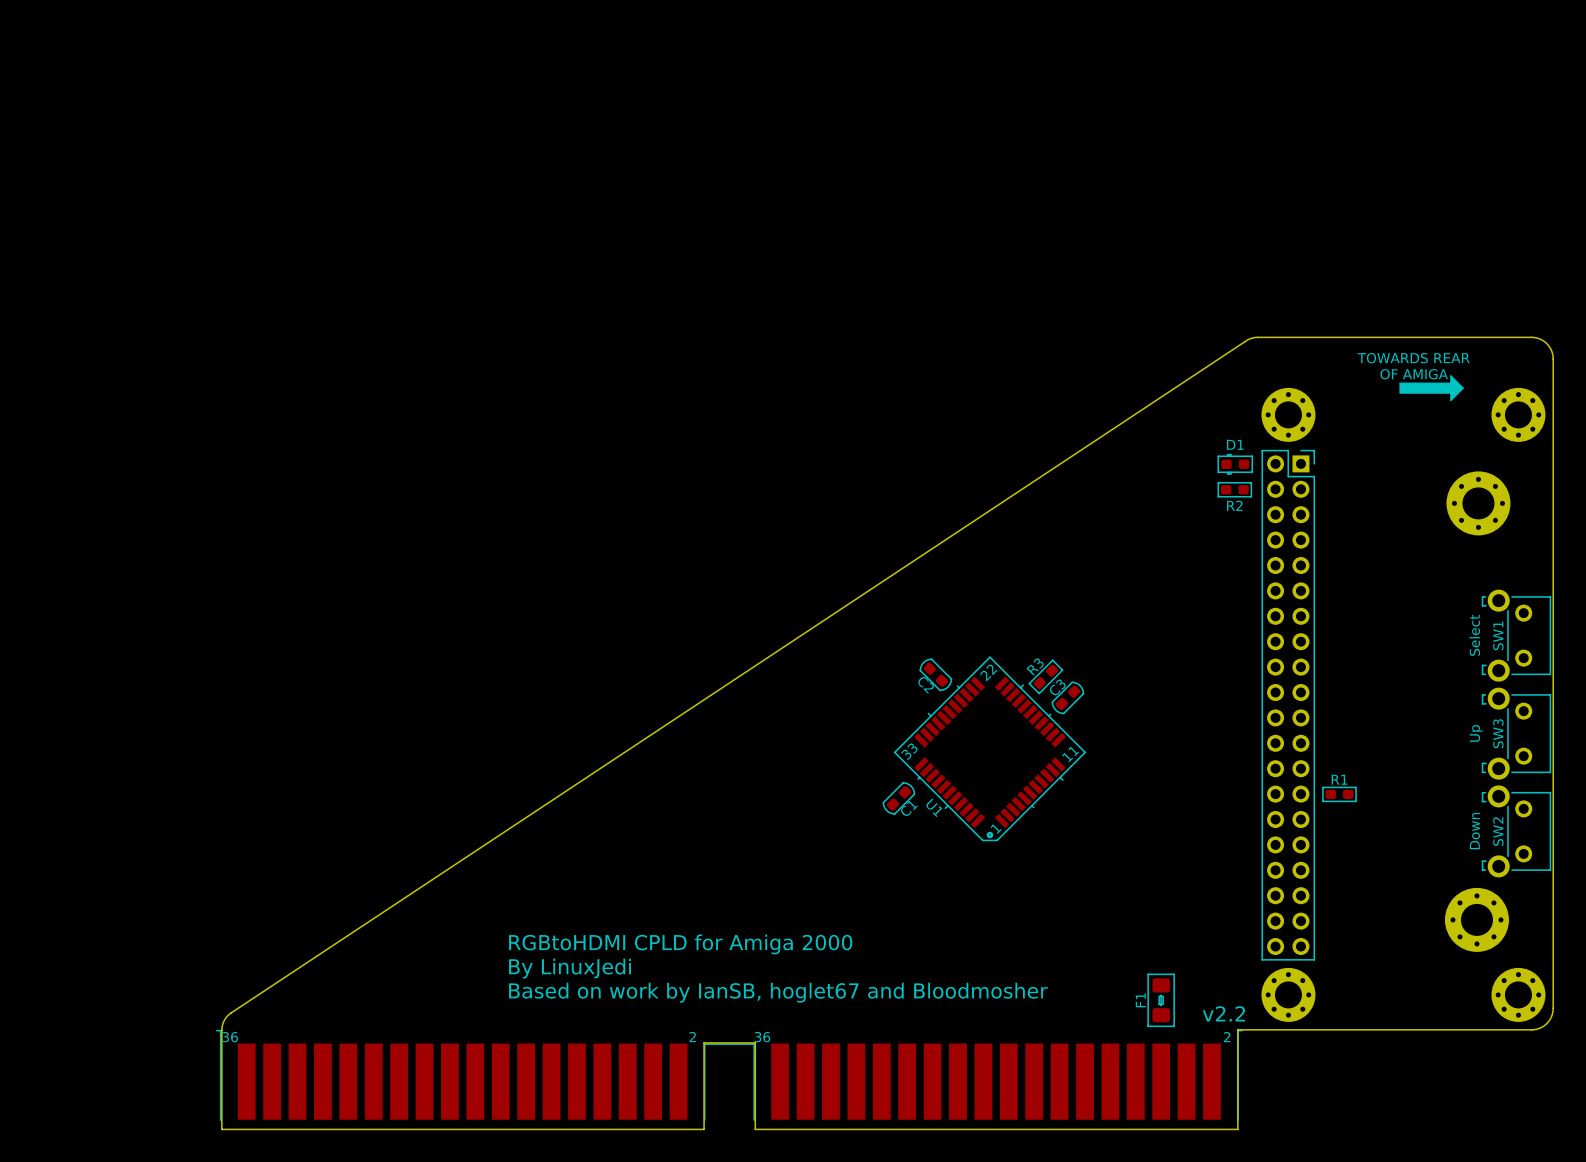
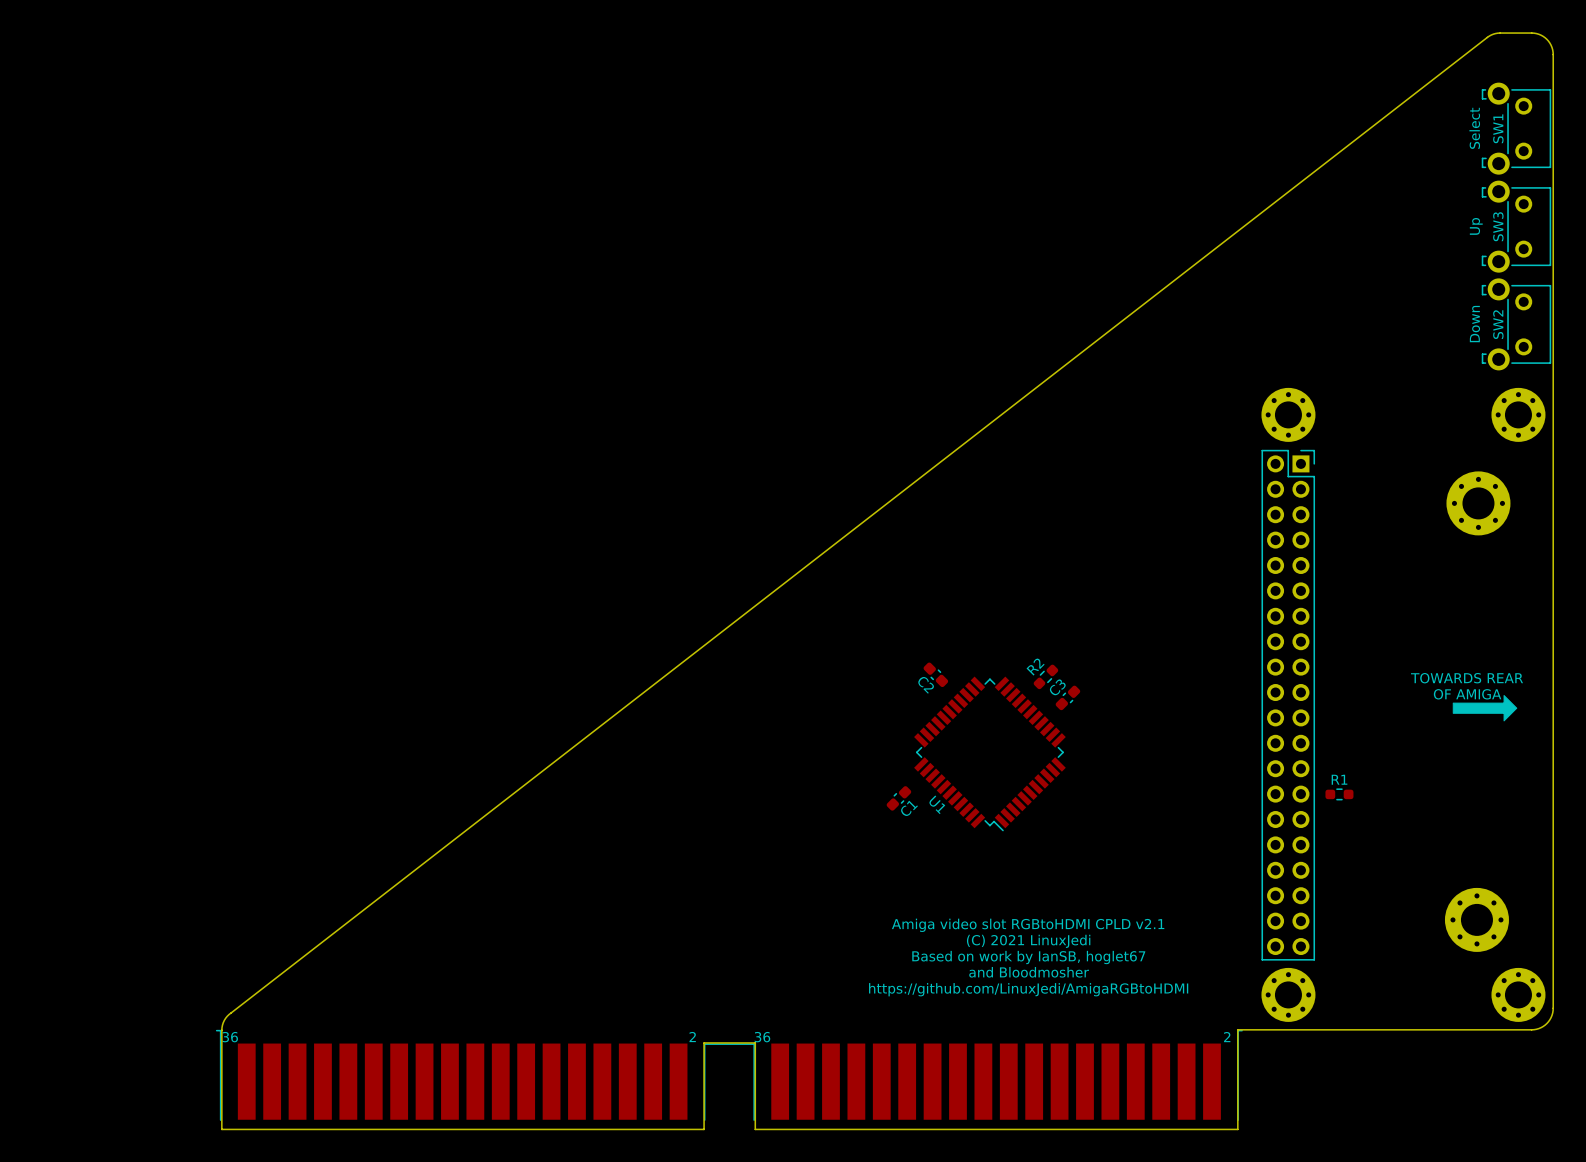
text: none -> Select (1474, 128)
text: none -> Up (1476, 226)
text: none -> Down (1474, 324)
text: TOWARDS REAR (1413, 358) -> none
board edge: (1553, 358) (1551, 349) (1546, 343) (1534, 337) (1257, 337) (1248, 339) (231, 1012) -> (1553, 358) (1552, 49) (1546, 39) (1536, 33) (1495, 33) (1487, 37) (231, 1012)
drawing: [1399, 374, 1464, 402] -> none
text: OF AMIGA (1414, 374) -> none
D1: (1235, 464) -> none
R2 footprint: [1217, 482, 1252, 498] -> [1033, 664, 1059, 690]
R2 name position: R2 (1234, 505) -> R2 (1035, 667)
text: Select (1474, 635) -> none
SW1 position: (1516, 635) -> (1516, 128)
U1 footprint: [894, 656, 1086, 842] -> [914, 676, 1066, 832]
C2 footprint: [919, 658, 953, 691] -> [923, 662, 949, 688]
R3: (1045, 676) -> none
text: none -> TOWARDS REAR (1467, 678)
C3 footprint: [1051, 681, 1085, 715] -> [1055, 685, 1081, 711]
text: none -> OF AMIGA (1467, 694)
drawing: none -> [1452, 695, 1518, 722]
text: Up (1476, 733) -> none
SW3 position: (1516, 733) -> (1516, 226)
C1 footprint: [882, 782, 916, 815] -> [886, 786, 912, 811]
R1 footprint: [1322, 786, 1357, 802] -> [1325, 788, 1354, 801]
text: Down (1474, 831) -> none
SW2 position: (1516, 831) -> (1516, 324)
text: none -> Amiga video slot RGBtoHDMI CPLD v2.1 (1028, 925)
text: none -> (C) 2021 LinuxJedi (1028, 941)
text: RGBtoHDMI CPLD for Amiga 2000 (680, 944) -> none
text: none -> Based on work by IanSB, hoglet67 (1028, 957)
text: By LinuxJedi (570, 968) -> none
text: none -> and Bloodmosher (1029, 972)
text: none -> https://github.com/LinuxJedi/AmigaRGBtoHDMI (1028, 989)
text: Based on work by IanSB, hoglet67 and Bloodmosher (778, 992) -> none
F1: (1161, 1000) -> none
text: v2.2 (1223, 1013) -> none

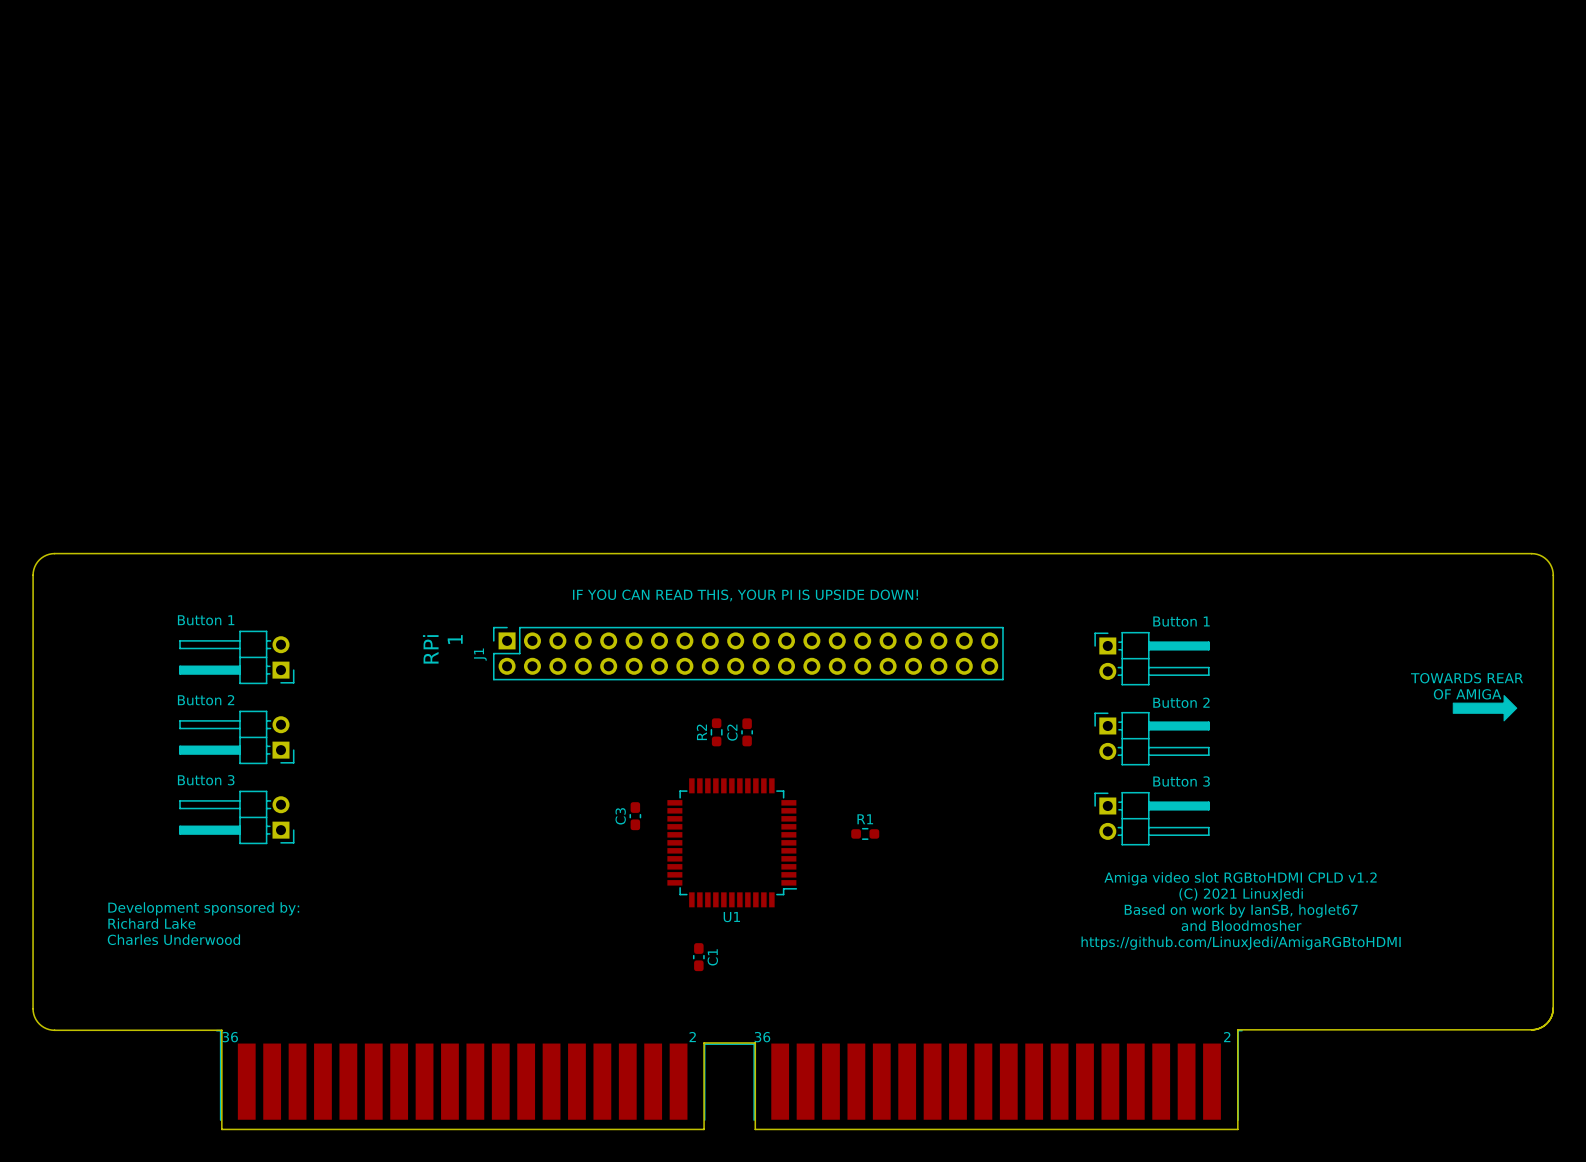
text: Select (1474, 128) -> none
SW1: (1516, 128) -> none
text: Up (1476, 226) -> none
SW3: (1516, 226) -> none
text: Down (1474, 324) -> none
SW2: (1516, 324) -> none
part: (1288, 414) -> none
part: (1518, 414) -> none
part: (1478, 503) -> none
text: none -> IF YOU CAN READ THIS, YOUR PI IS UPSIDE DOWN! (745, 595)
text: none -> Button 1 (206, 620)
text: none -> Button 1 (1181, 621)
text: none -> 1 (455, 639)
text: none -> RPi (430, 649)
J1: none -> (748, 653)
part: none -> (236, 657)
part: none -> (1151, 658)
C2 rotation: 0° (935, 674) -> 45° clockwise (747, 732)
C2 position: (935, 674) -> (747, 732)
R2 rotation: 0° (1045, 676) -> 45° counterclockwise (716, 732)
R2 position: (1045, 676) -> (716, 732)
C3 rotation: 0° (1067, 697) -> 45° counterclockwise (635, 816)
C3 position: (1067, 697) -> (635, 816)
text: none -> Button 2 (206, 700)
text: none -> Button 2 (1181, 702)
part: (1288, 705) -> none
part: none -> (236, 737)
part: none -> (1151, 738)
U1 rotation: 0° (989, 753) -> 45° counterclockwise (732, 842)
U1 position: (989, 753) -> (732, 842)
text: none -> Button 3 (206, 780)
text: none -> Button 3 (1181, 781)
R1 position: (1339, 794) -> (865, 833)
C1 rotation: 0° (898, 798) -> 45° counterclockwise (698, 957)
C1 position: (898, 798) -> (698, 957)
part: none -> (236, 817)
part: none -> (1151, 818)
text: none -> Amiga video slot RGBtoHDMI CPLD v1.2 (1240, 878)
text: none -> Development sponsored by: (203, 908)
part: (1476, 919) -> none
text: none -> Richard Lake (151, 923)
text: Amiga video slot RGBtoHDMI CPLD v2.1 (1028, 925) -> none
text: none -> Charles Underwood (173, 939)
text position: (C) 2021 LinuxJedi (1028, 941) -> (C) 2021 LinuxJedi (1241, 894)
text position: Based on work by IanSB, hoglet67 (1028, 957) -> Based on work by IanSB, hoglet67 (1241, 910)
text position: and Bloodmosher (1029, 972) -> and Bloodmosher (1241, 925)
text position: https://github.com/LinuxJedi/AmigaRGBtoHDMI (1028, 989) -> https://github.com/LinuxJedi/AmigaRGBtoHDMI (1241, 943)
part: (1288, 994) -> none
part: (1518, 994) -> none
board edge: (1553, 1008) (1553, 54) (1548, 41) (1538, 34) (1500, 33) (1487, 37) (229, 1014) (224, 1020) (221, 1030) -> (1531, 1029) (1539, 1028) (1546, 1023) (1551, 1016) (1553, 1008) (1553, 575) (1548, 562) (1537, 554) (54, 553) (46, 555) (37, 562) (33, 575) (33, 1008) (34, 1016) (41, 1025) (51, 1030) (221, 1030)

